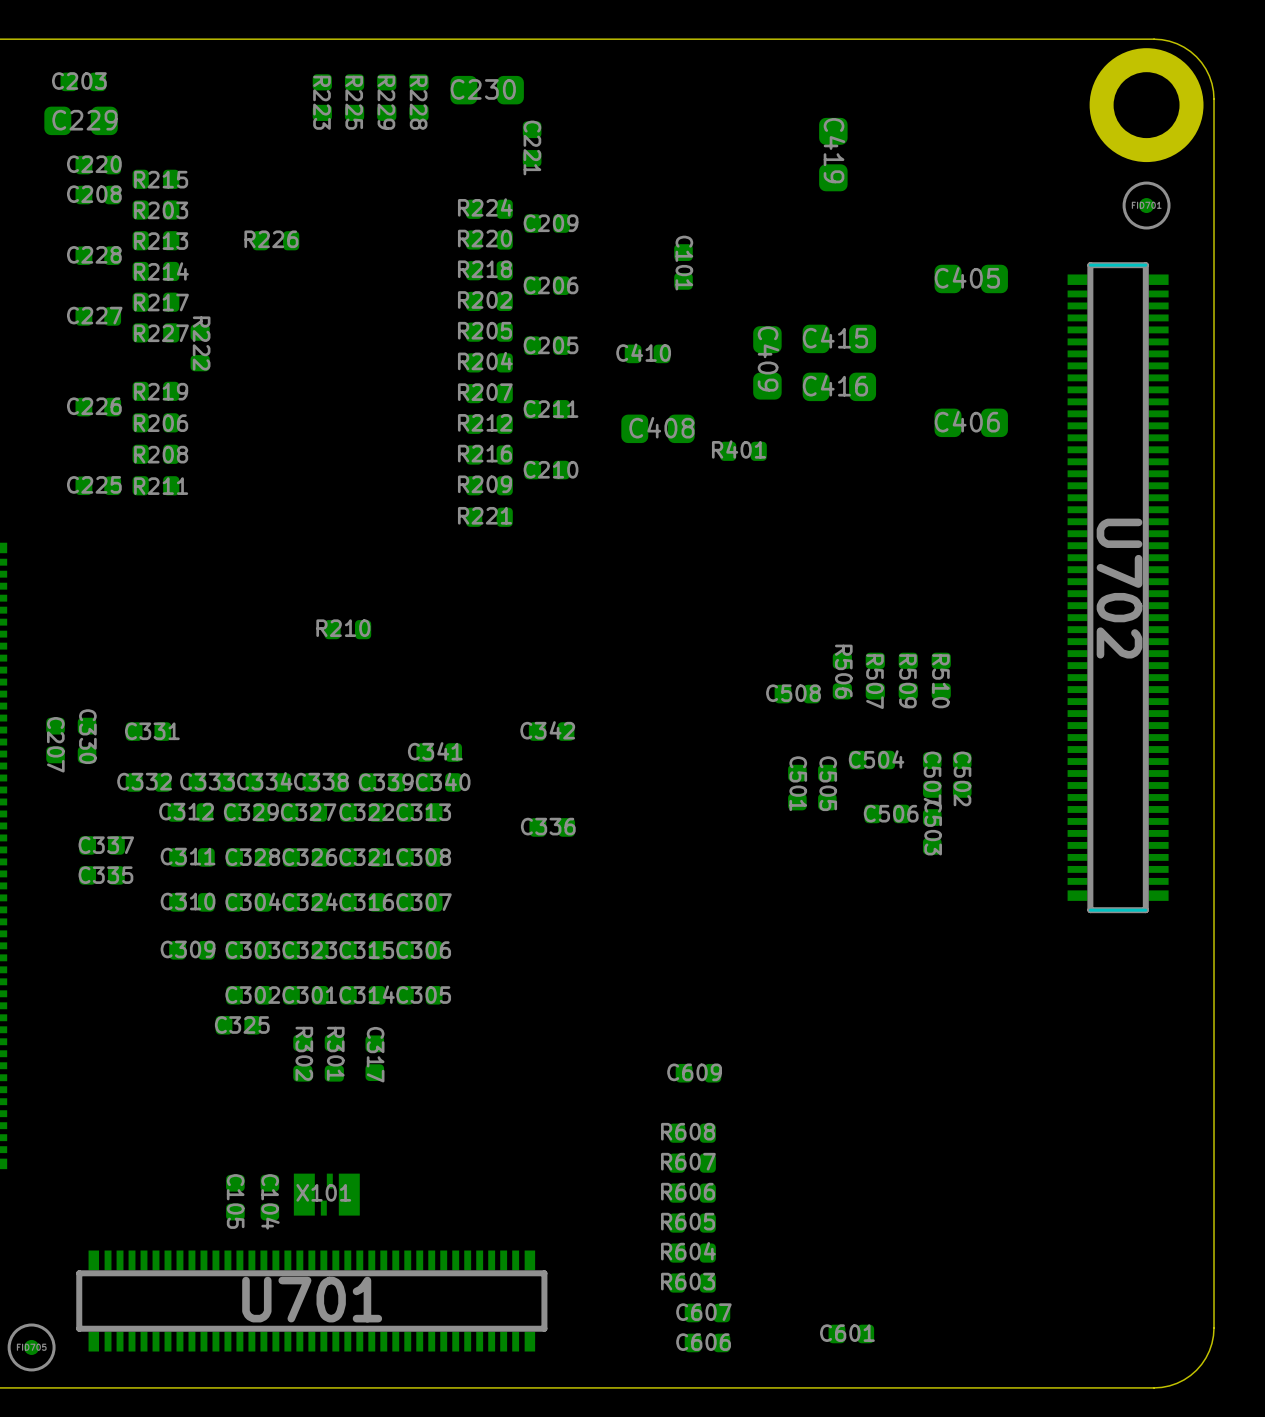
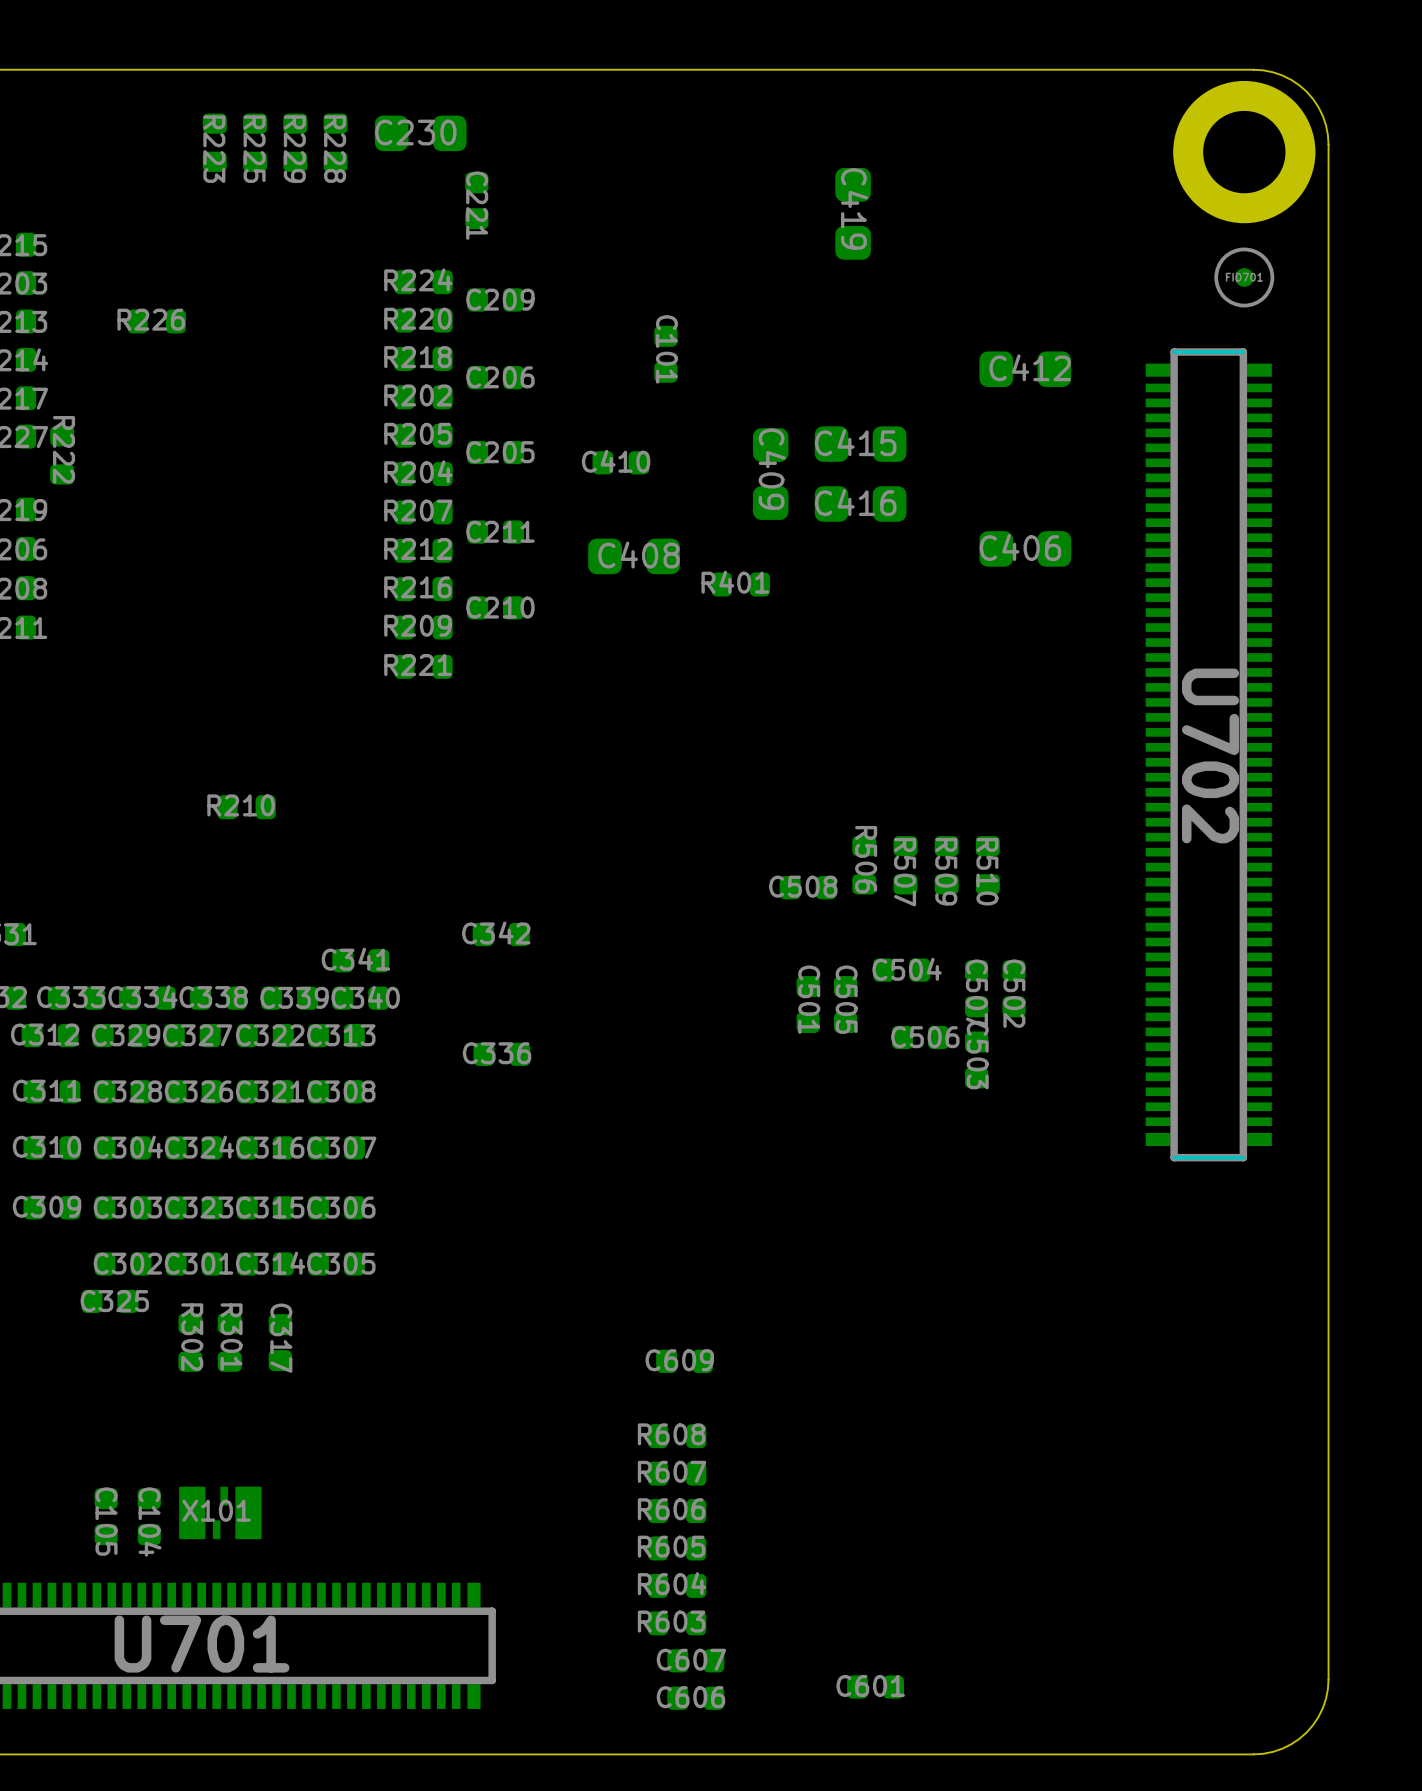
C405 name: C405 (967, 277) -> C412 (1030, 367)

